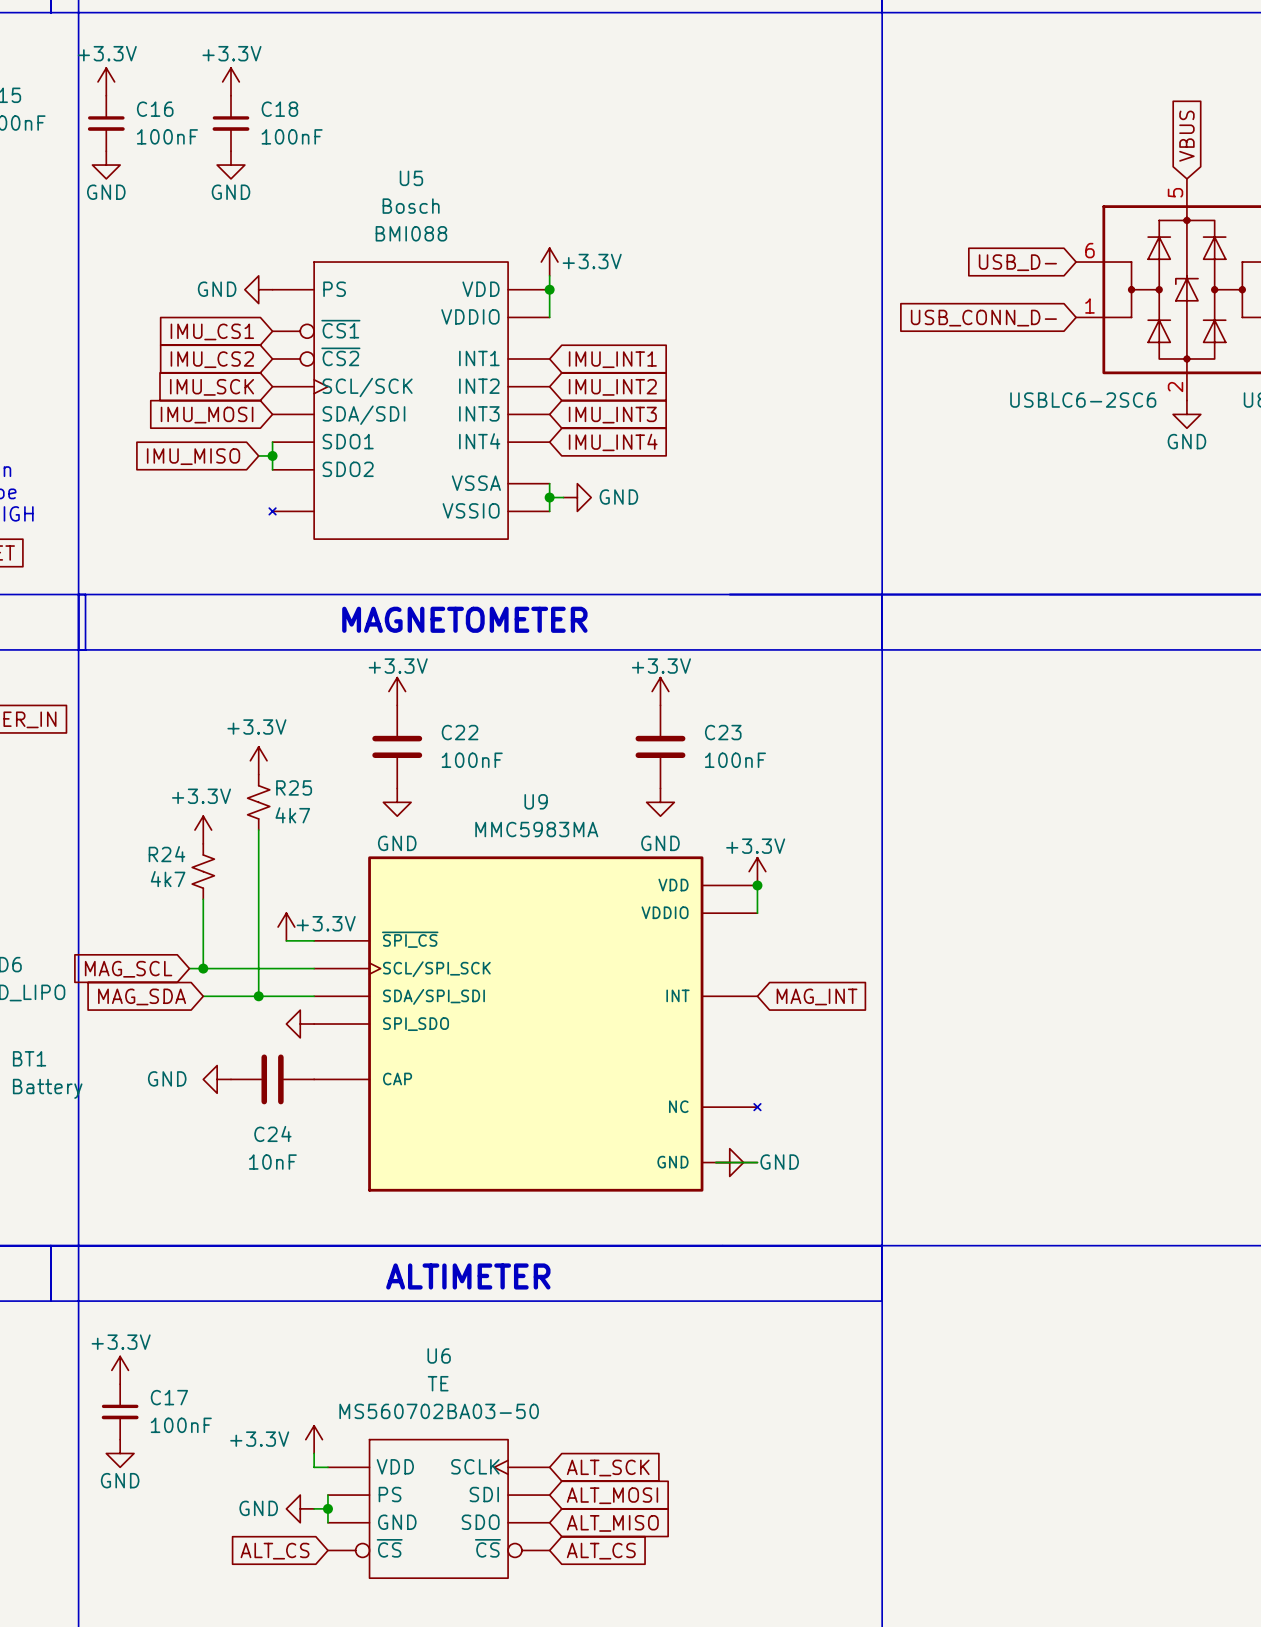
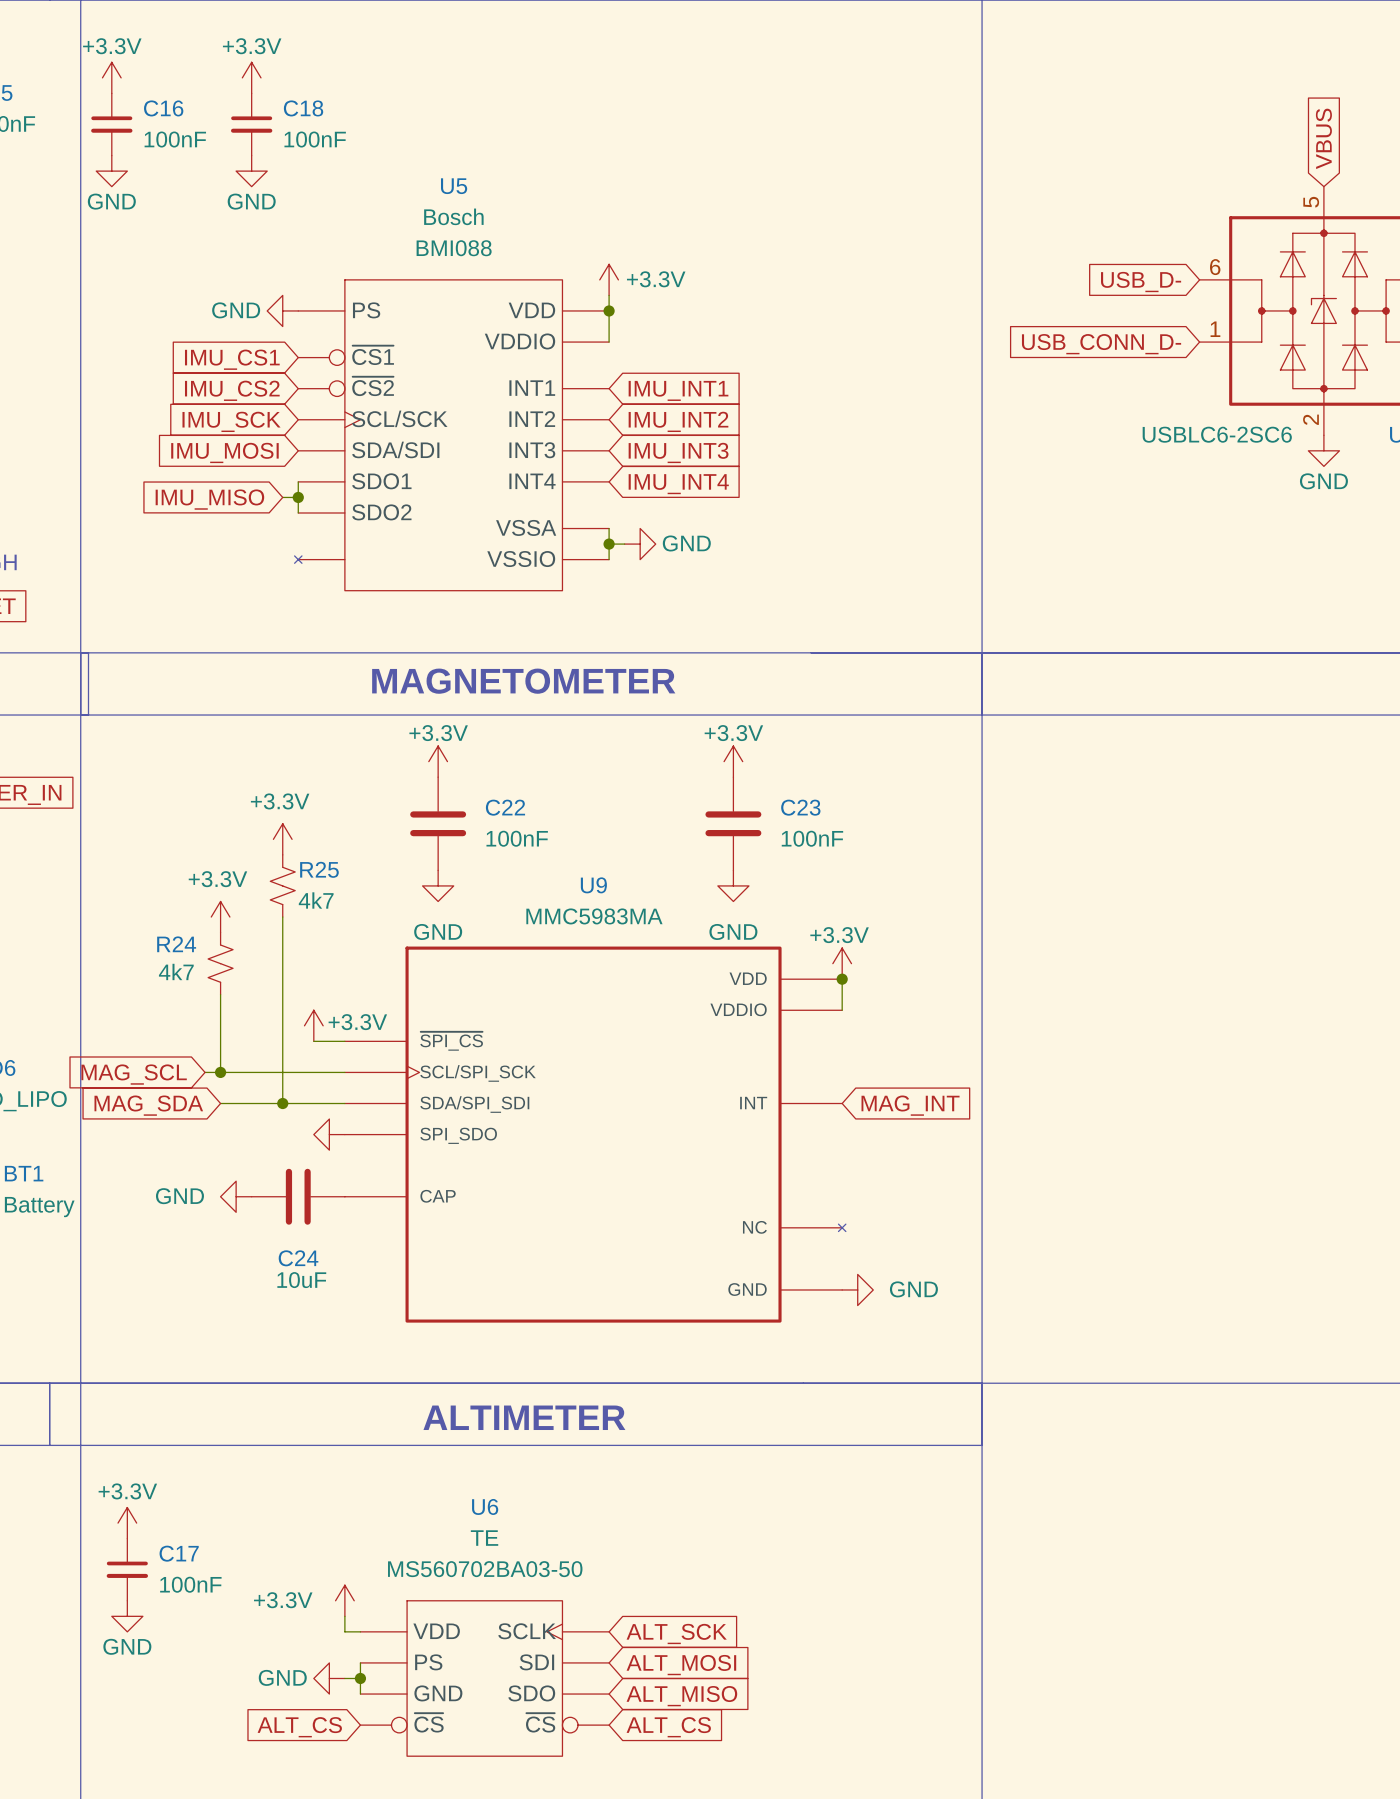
U9 symbol: [314, 856, 761, 1192] -> [344, 946, 846, 1323]
C24 value: 10nF (272, 1162) -> 10uF (301, 1280)
power symbol position: GND (729, 1162) -> GND (857, 1289)

